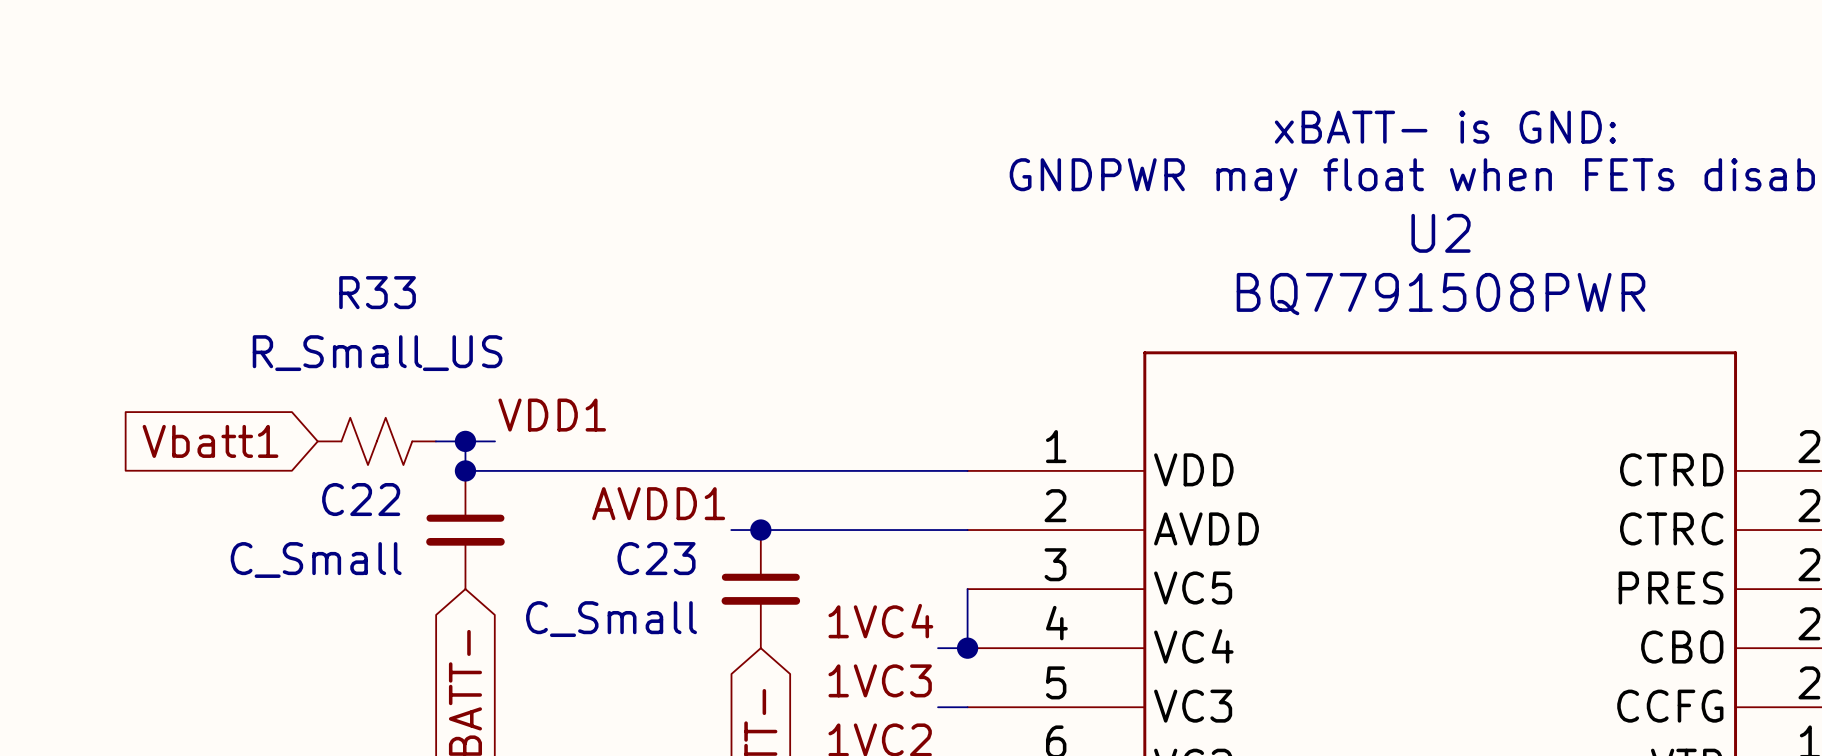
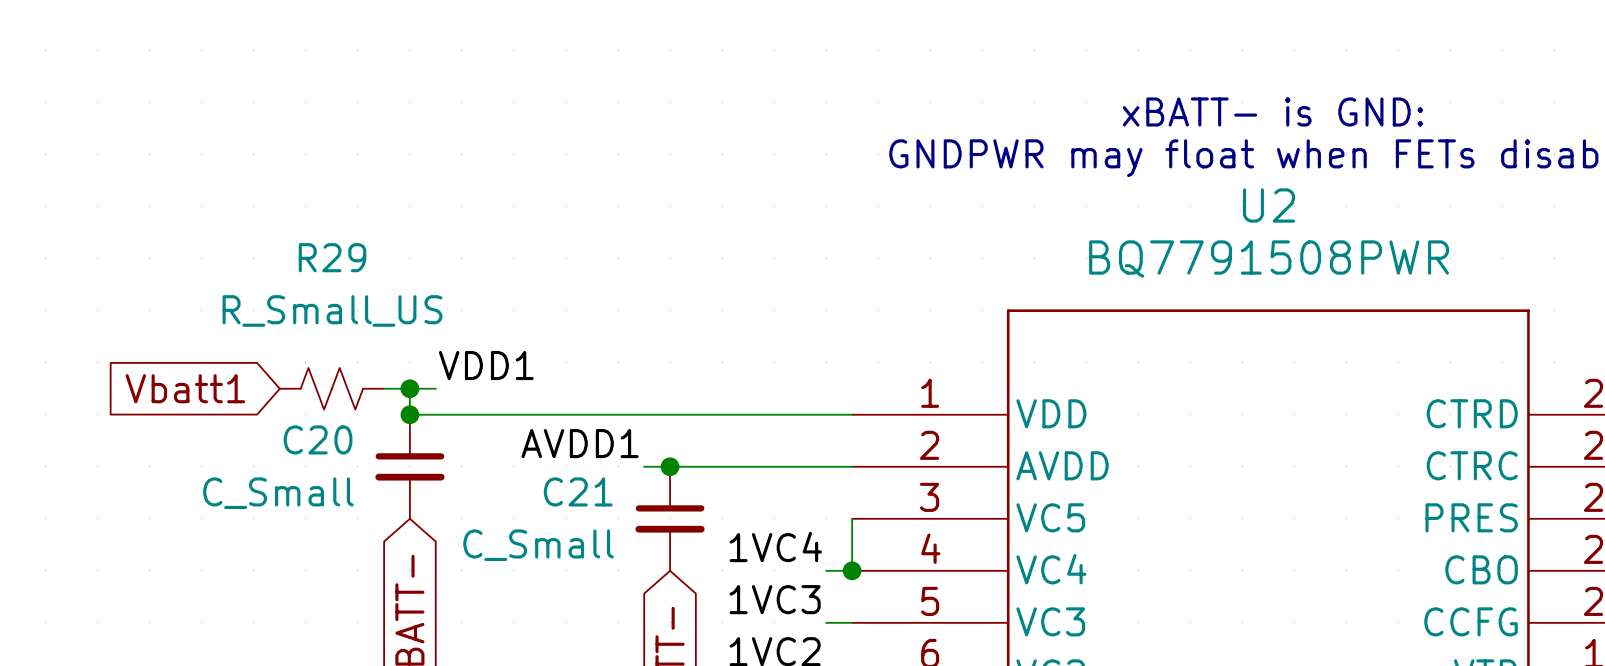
R33 name: R33 (377, 292) -> R29 (332, 257)
C22 name: C22 (361, 499) -> C20 (318, 439)
C23 name: C23 (656, 558) -> C21 (578, 491)

